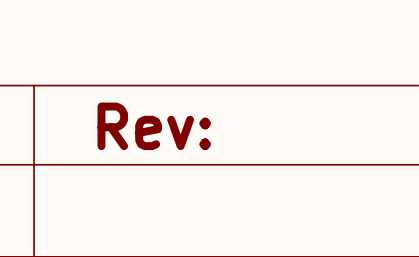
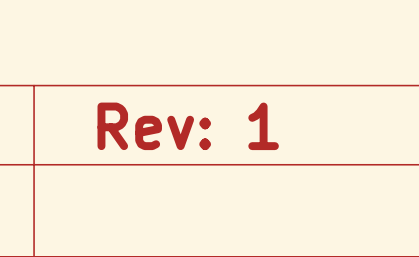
title block: Rev: (154, 126) -> Rev: 1 (188, 126)

